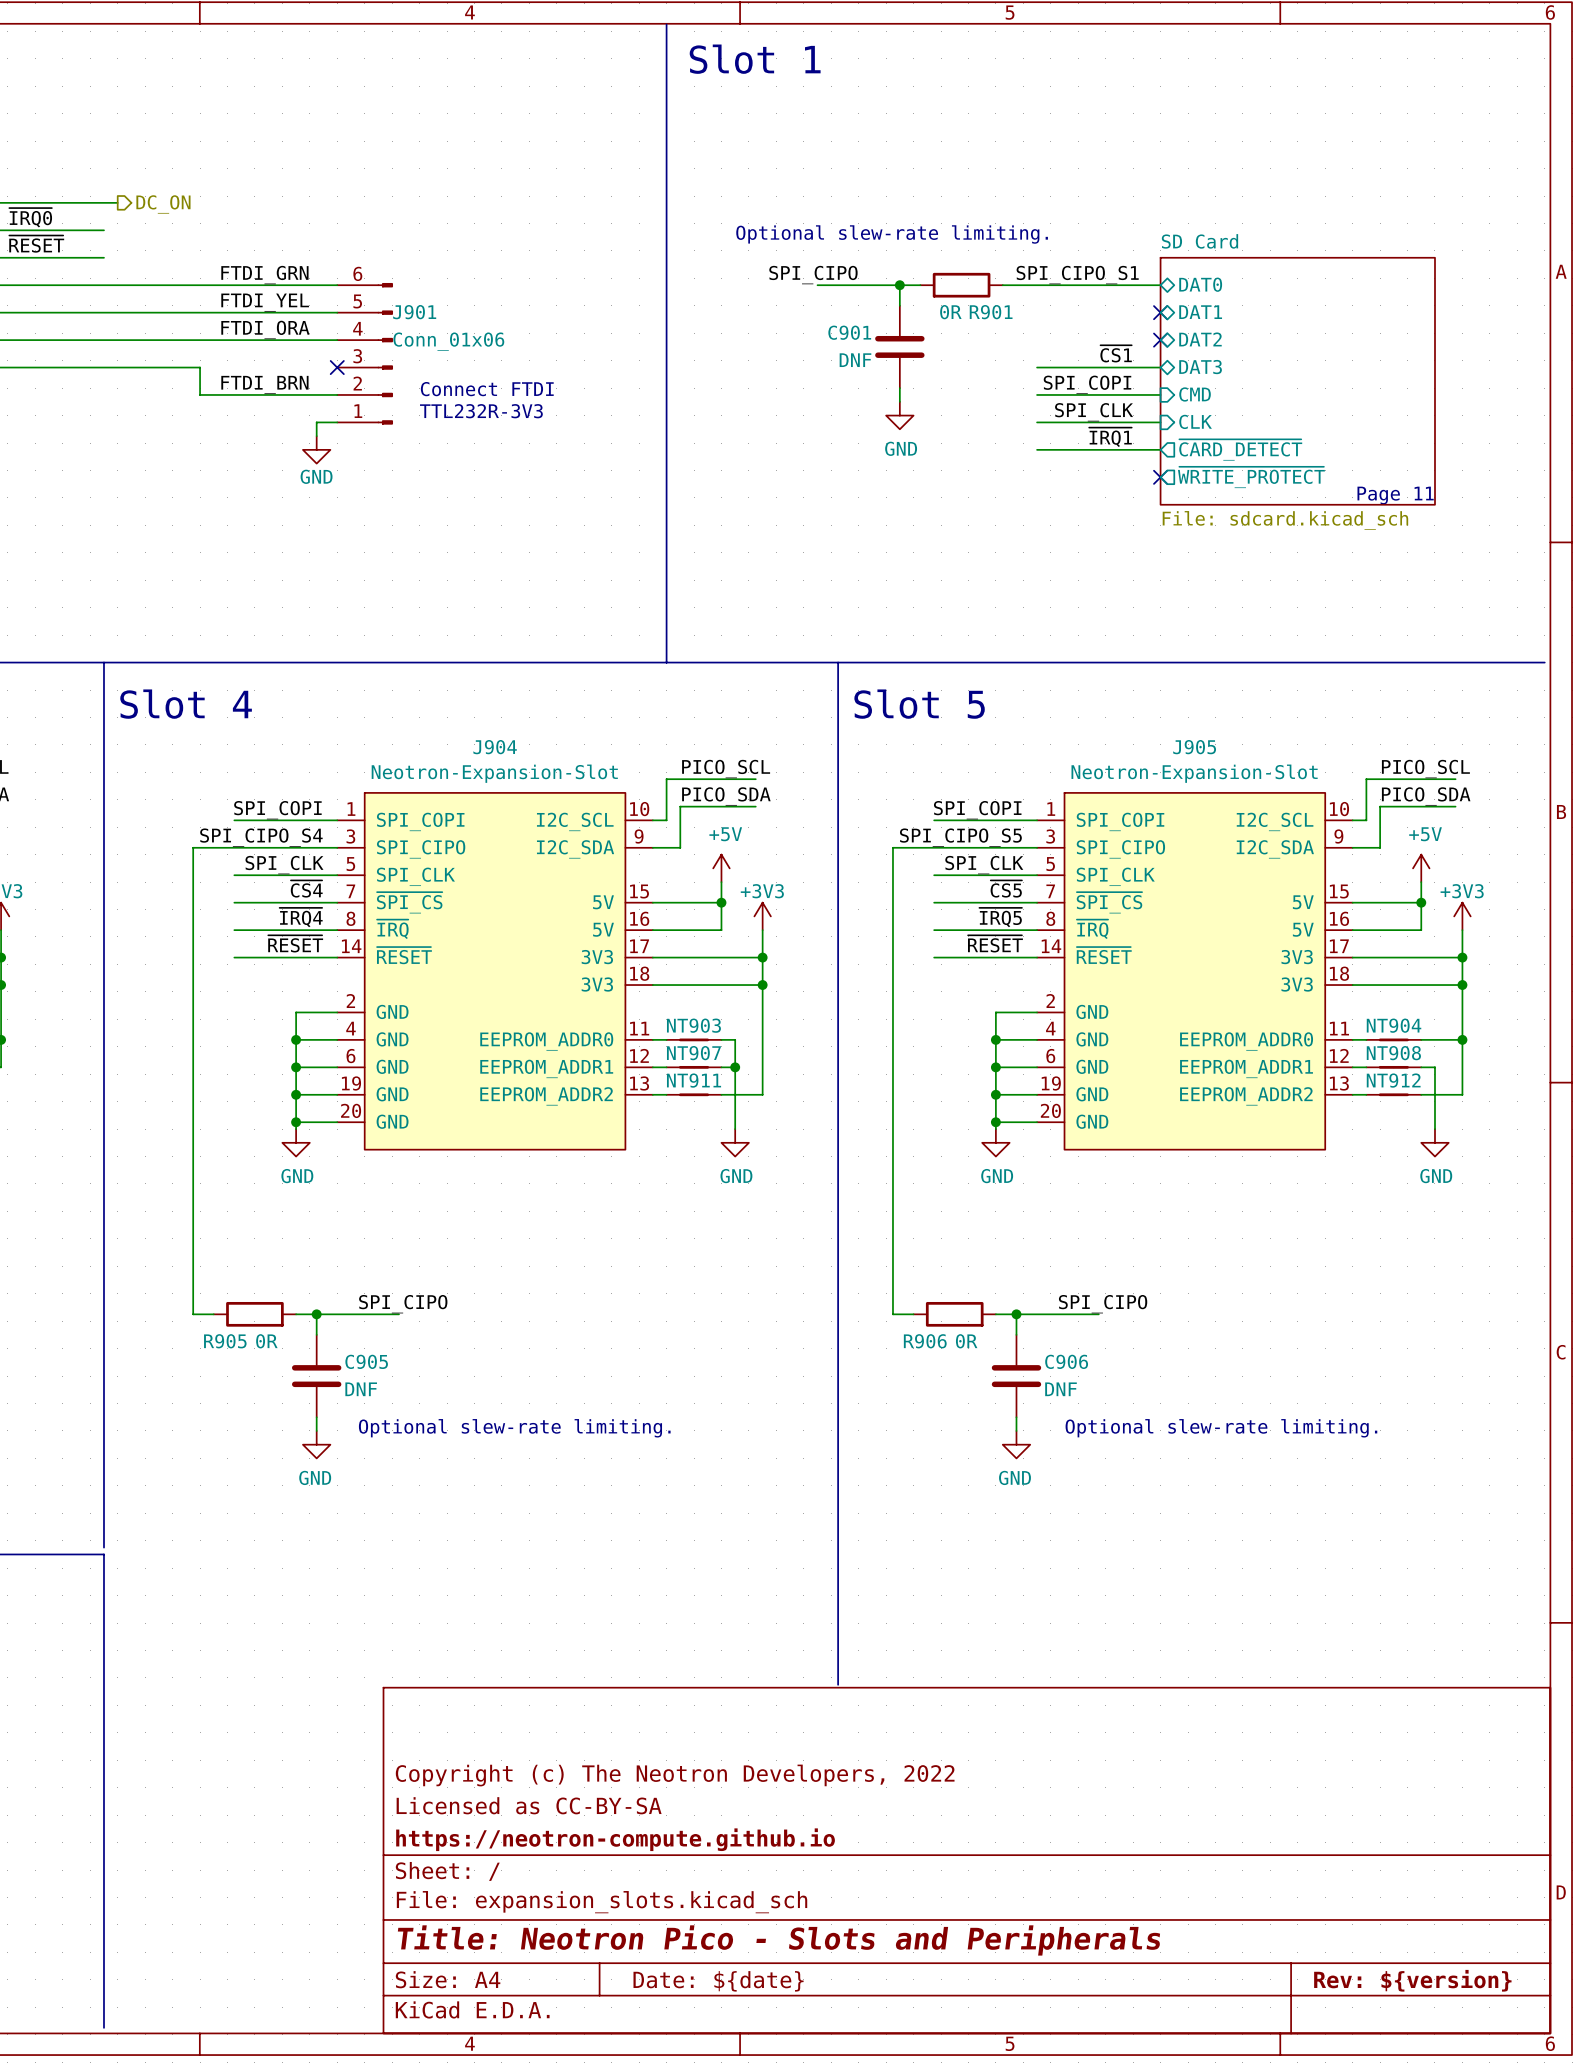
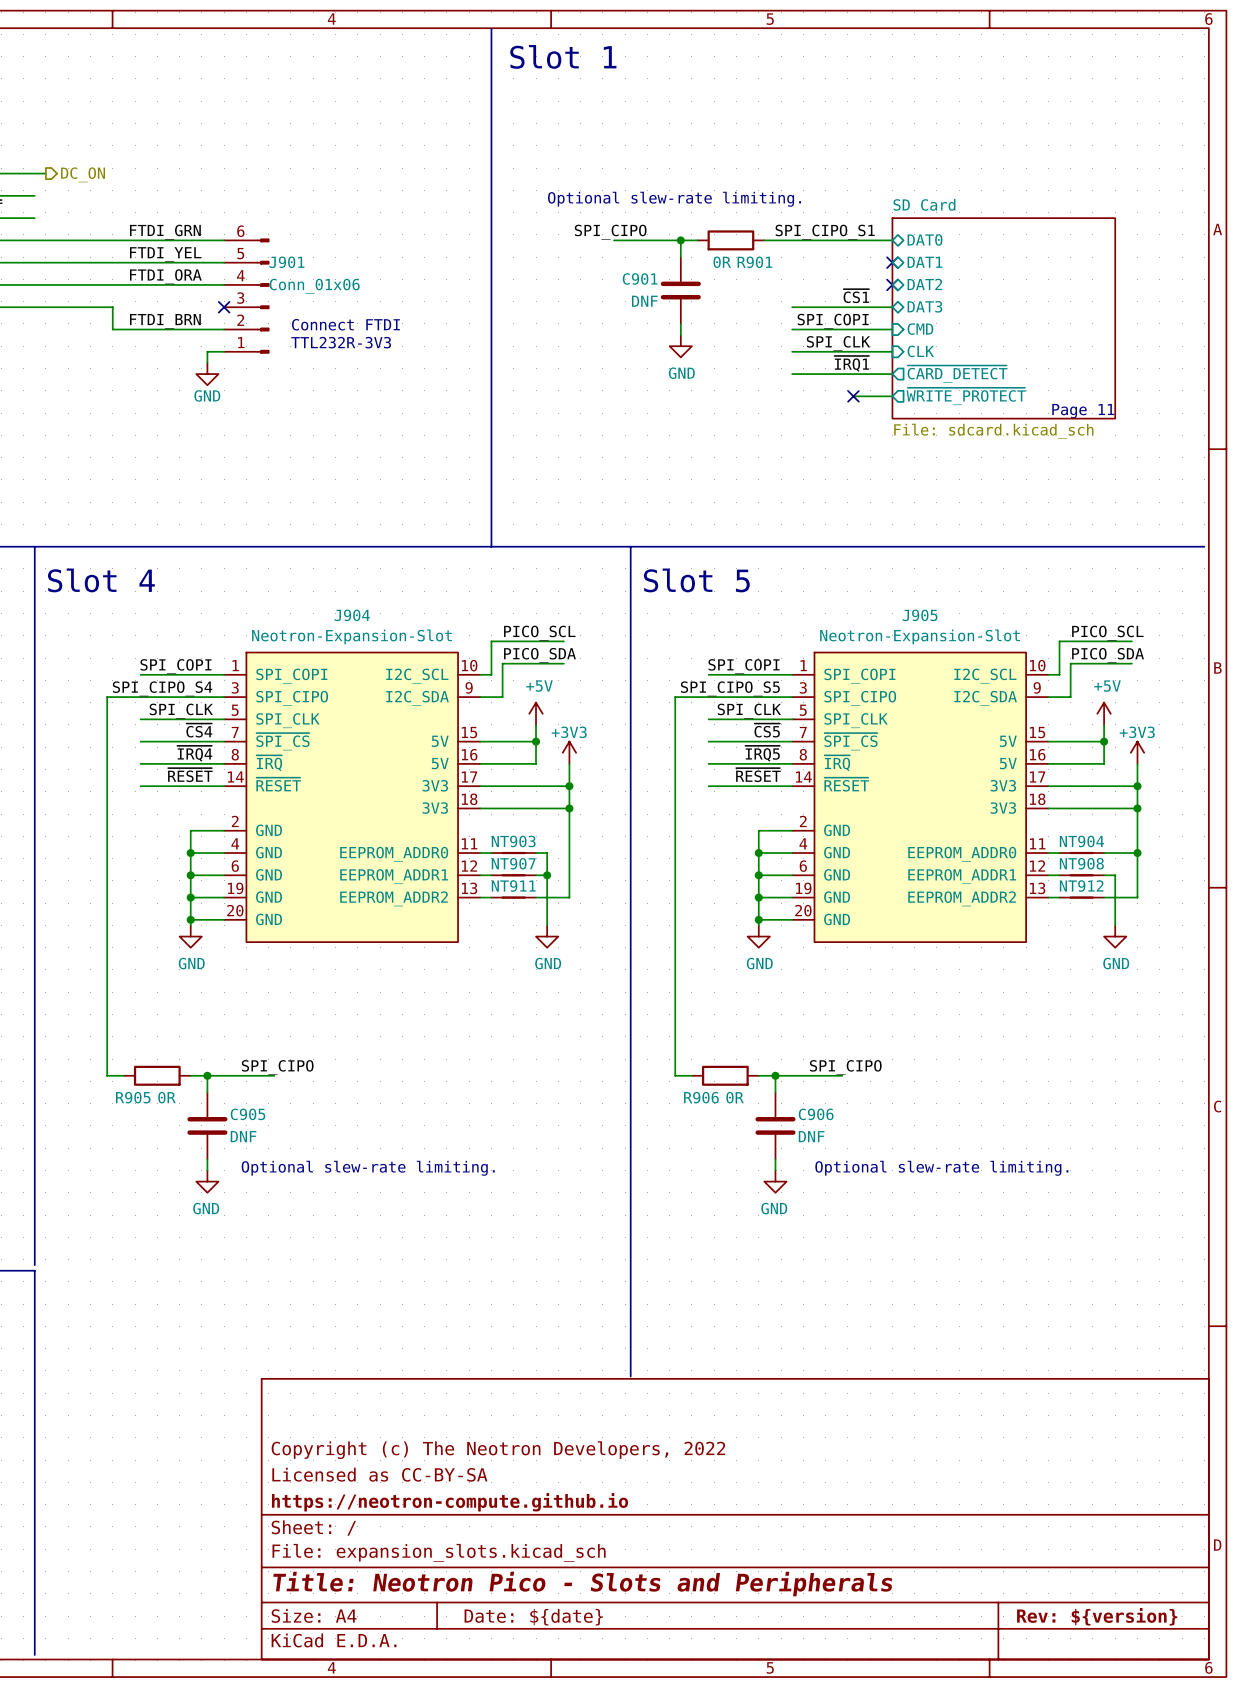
wire: none -> (853, 396) (892, 396)
no-connect mark position: (1160, 477) -> (853, 396)

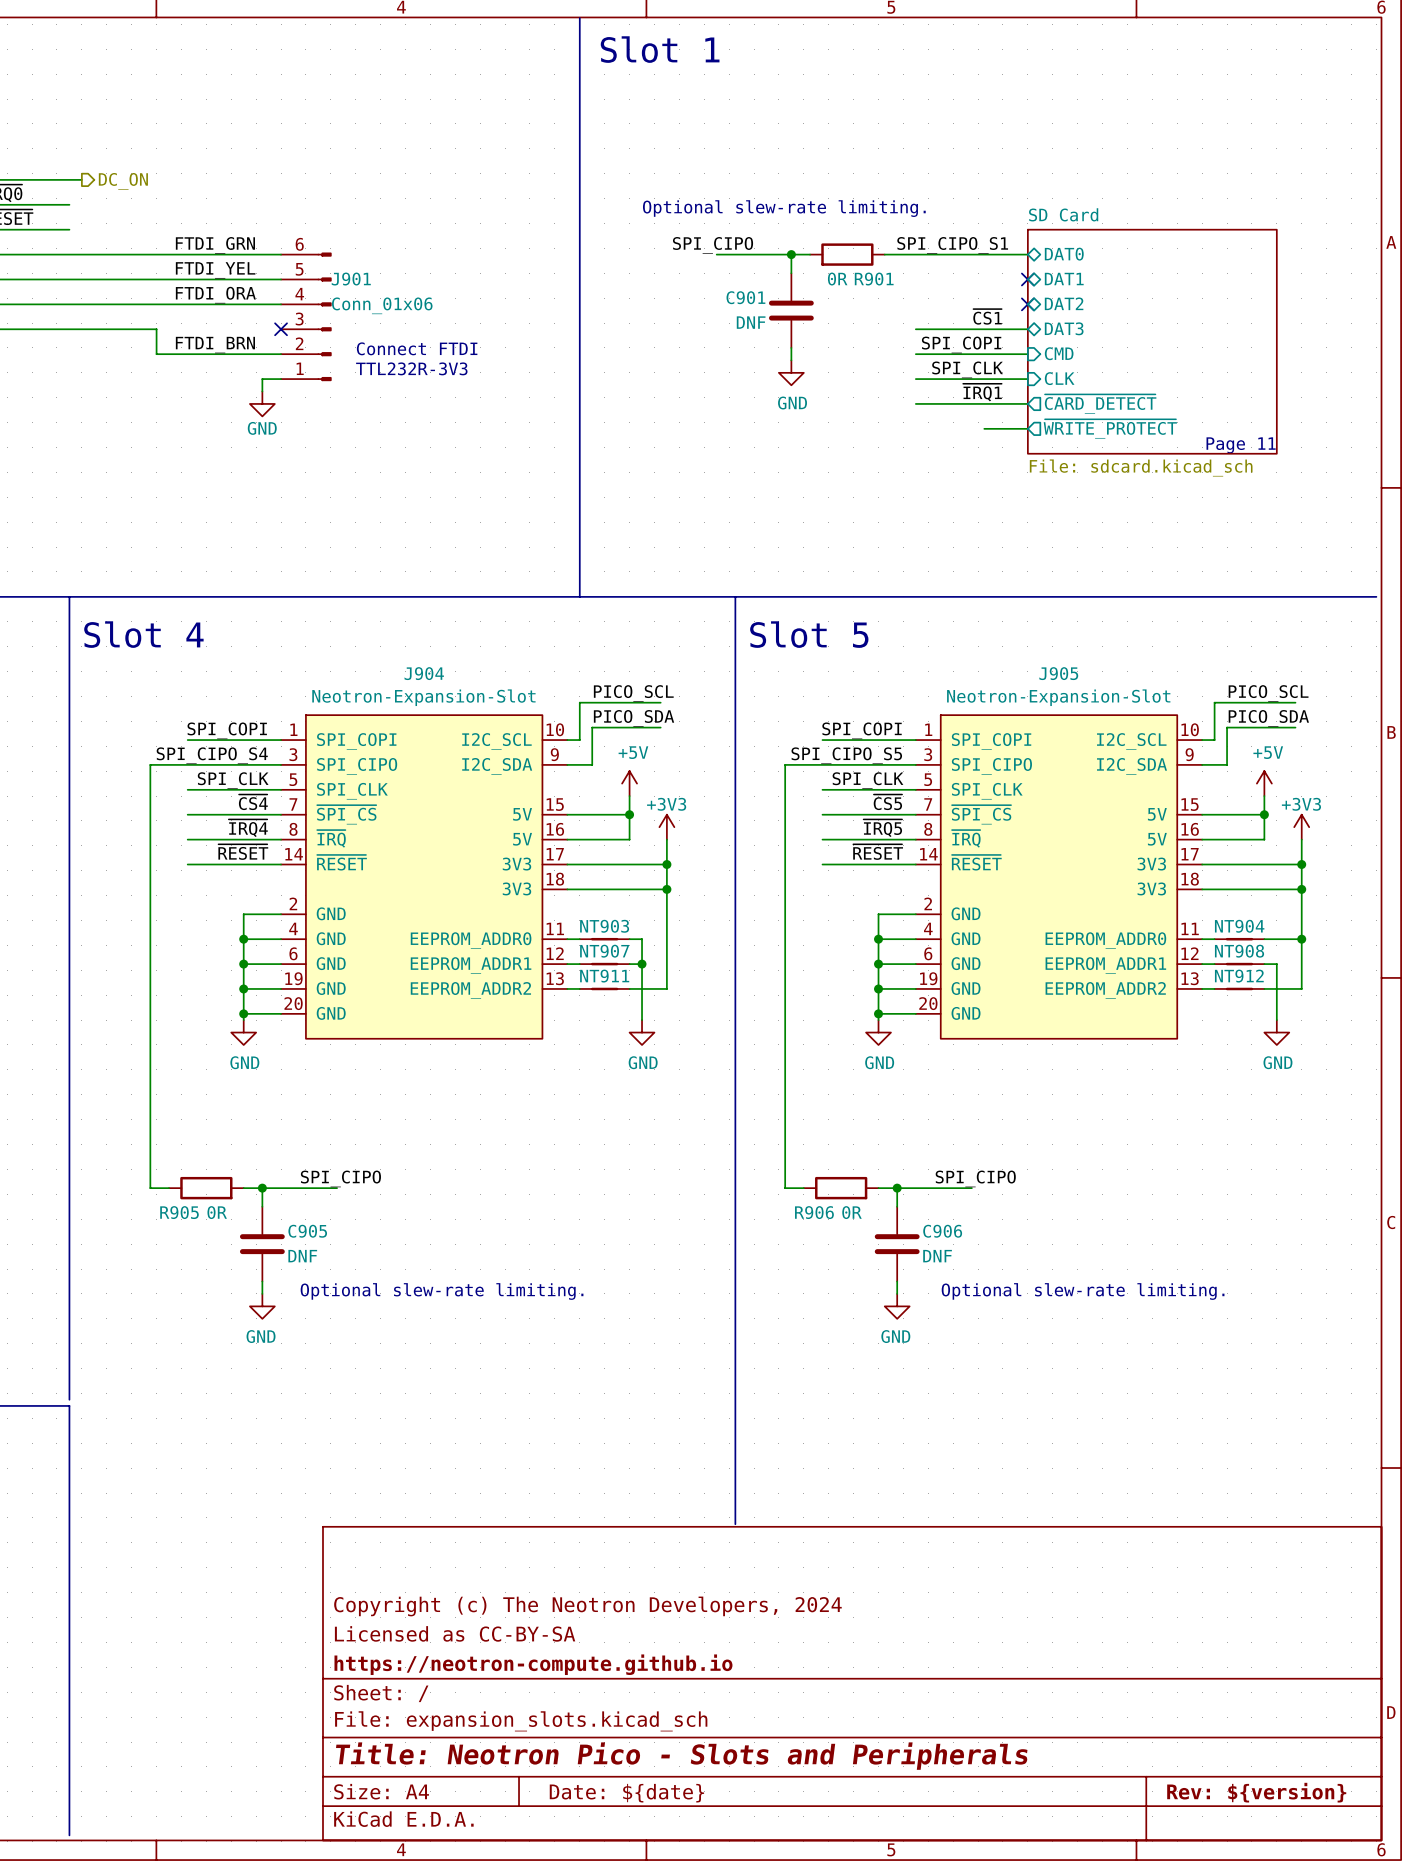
no-connect mark: (853, 396) -> none
title block: Copyright (c) The Neotron Developers, 2022 (498, 1450) -> Copyright (c) The Neotron Developers, 2024 (587, 1606)

